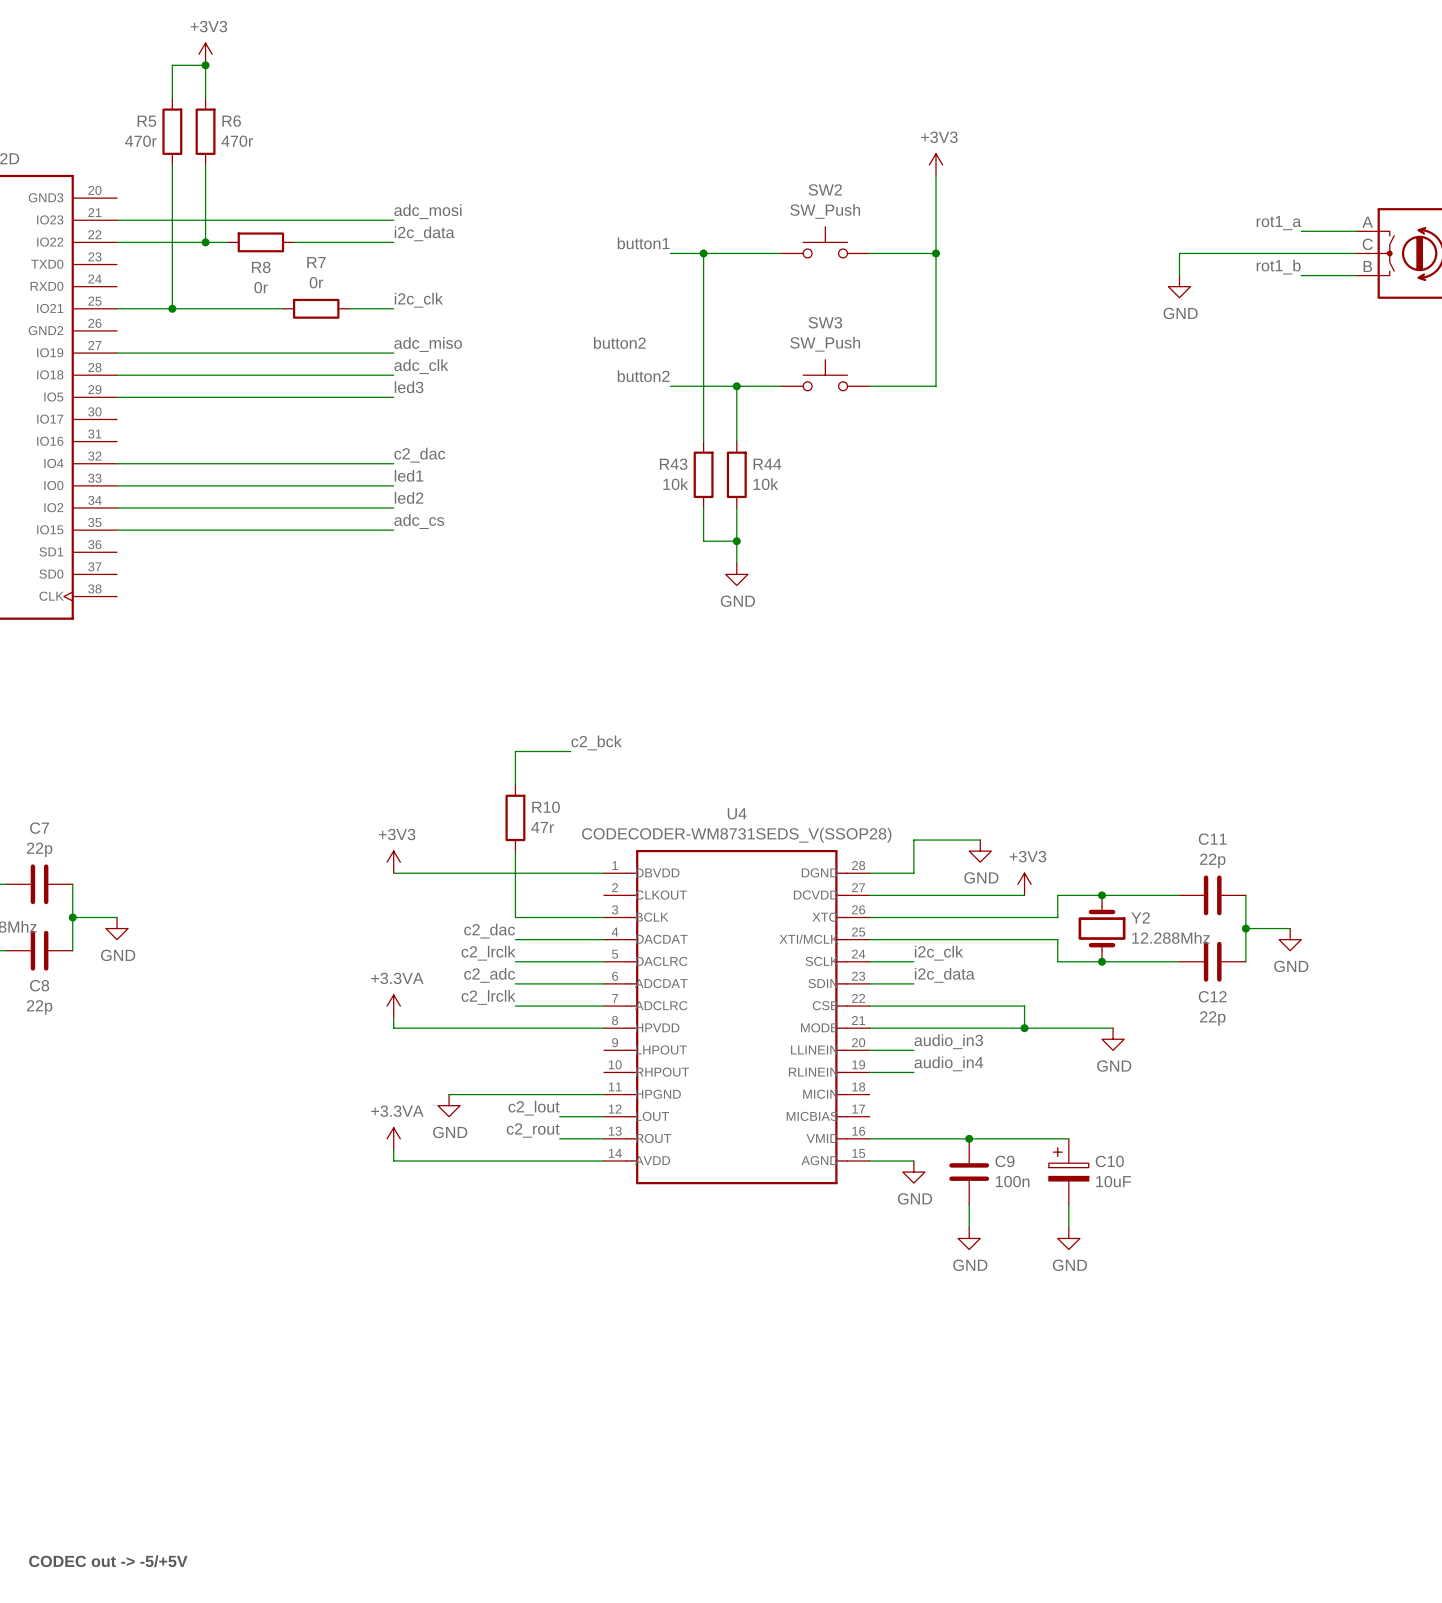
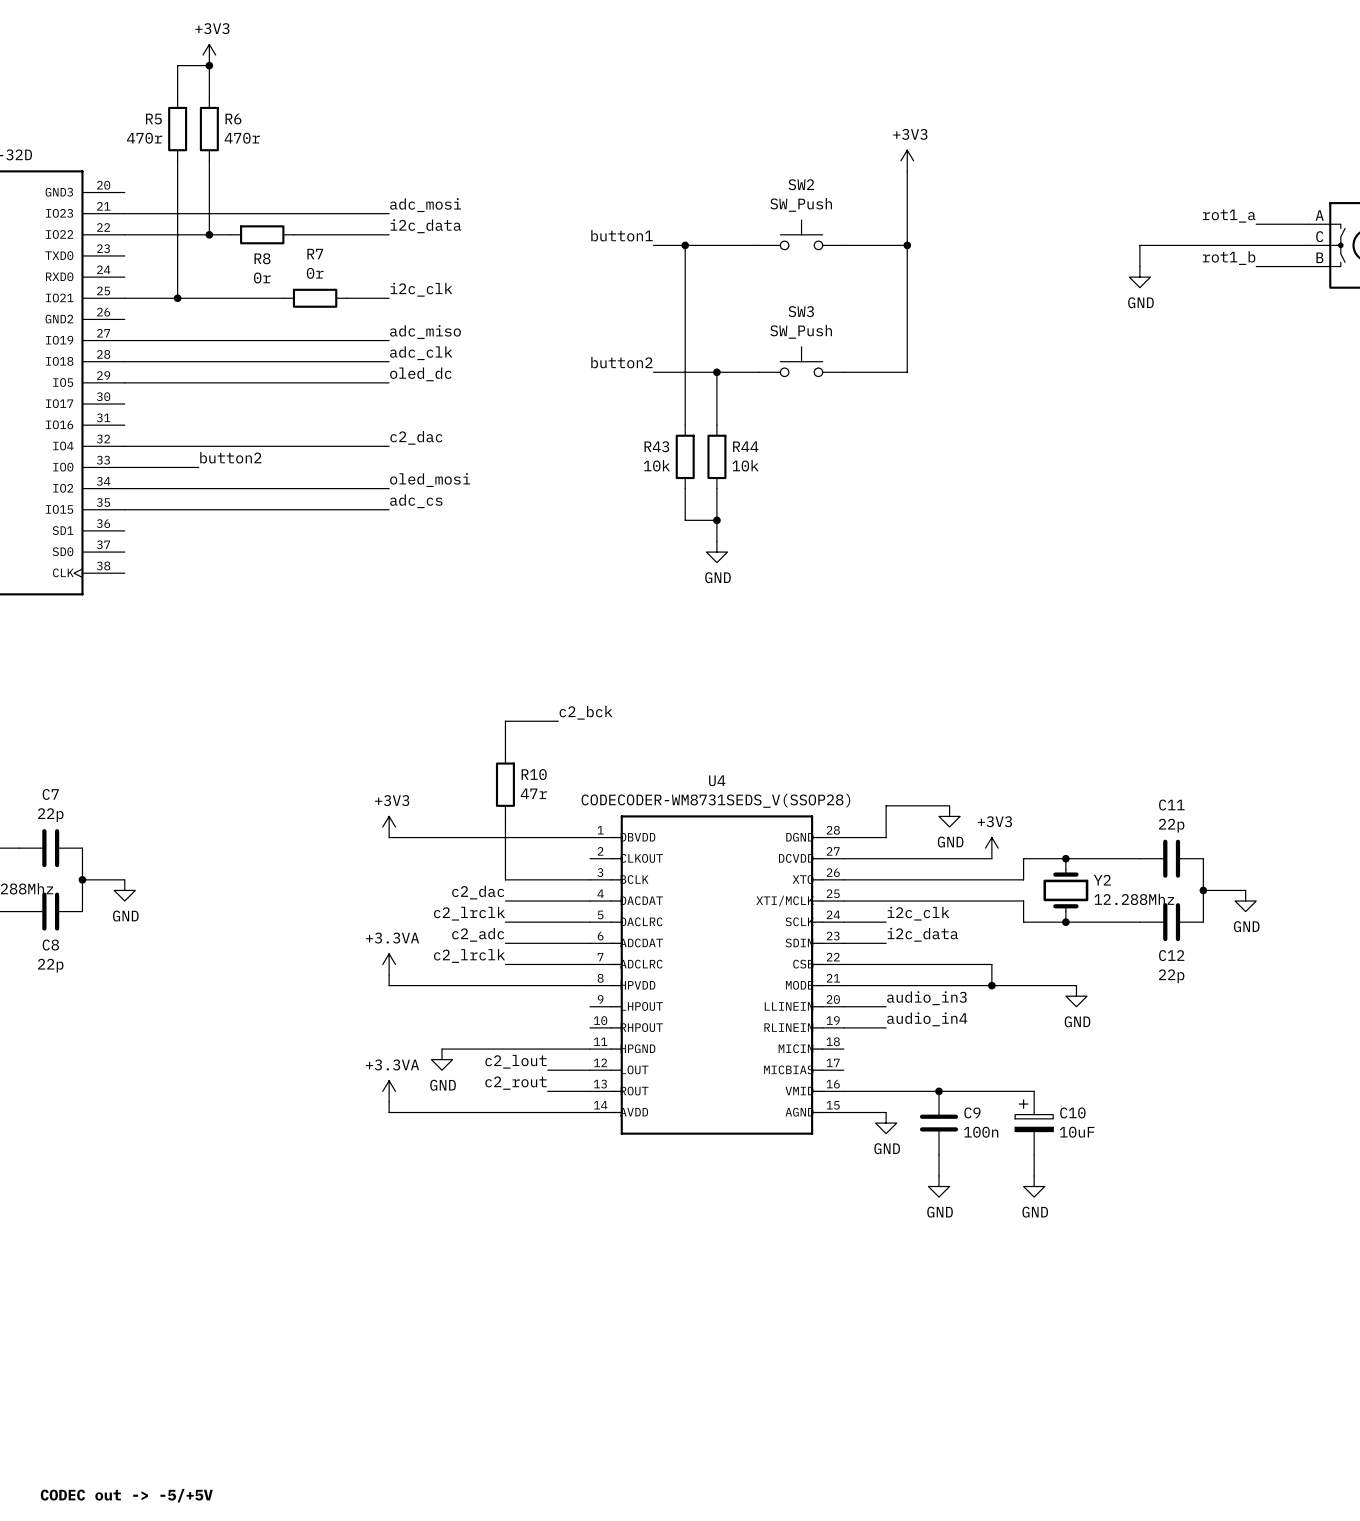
label: button2 (619, 342) -> none
label: led3 (409, 387) -> oled_dc (420, 374)
label: none -> button2 (230, 457)
label: led1 (409, 475) -> none
wire: (194, 485) (393, 485) -> none
label: led2 (409, 497) -> oled_mosi (430, 480)

